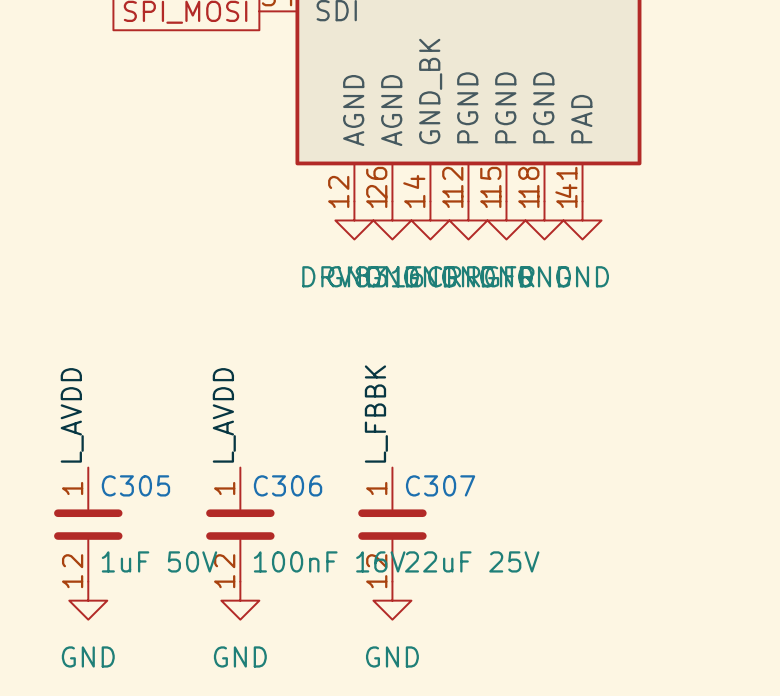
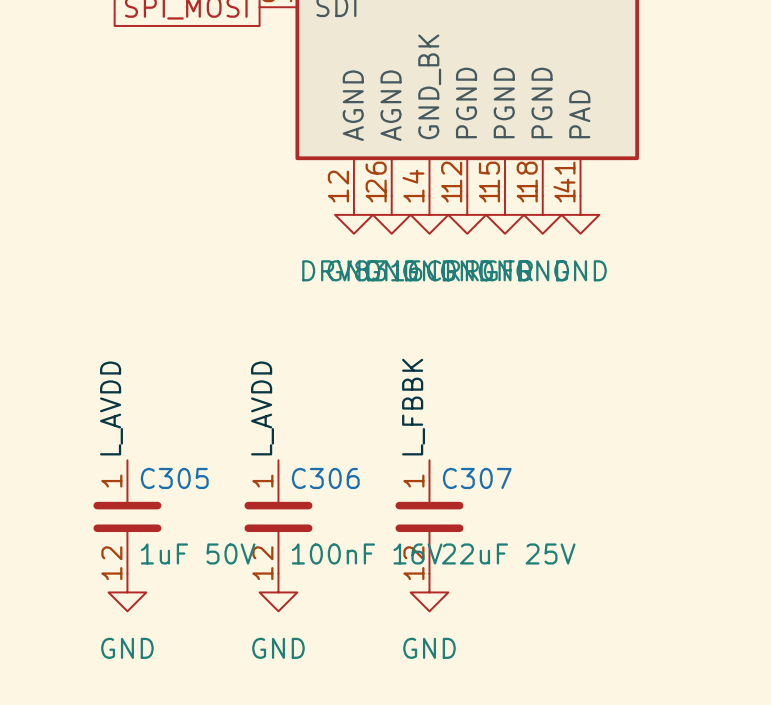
label position: L_FBBK (376, 414) -> L_FBBK (413, 407)
label position: L_AVDD (72, 415) -> L_AVDD (111, 408)
label position: L_AVDD (224, 415) -> L_AVDD (262, 408)
C305 position: (88, 524) -> (127, 516)
C306 position: (240, 524) -> (278, 516)
C307 position: (392, 524) -> (429, 516)
power symbol position: GND (88, 600) -> GND (127, 592)
power symbol position: GND (240, 600) -> GND (278, 592)
power symbol position: GND (392, 600) -> GND (429, 592)

